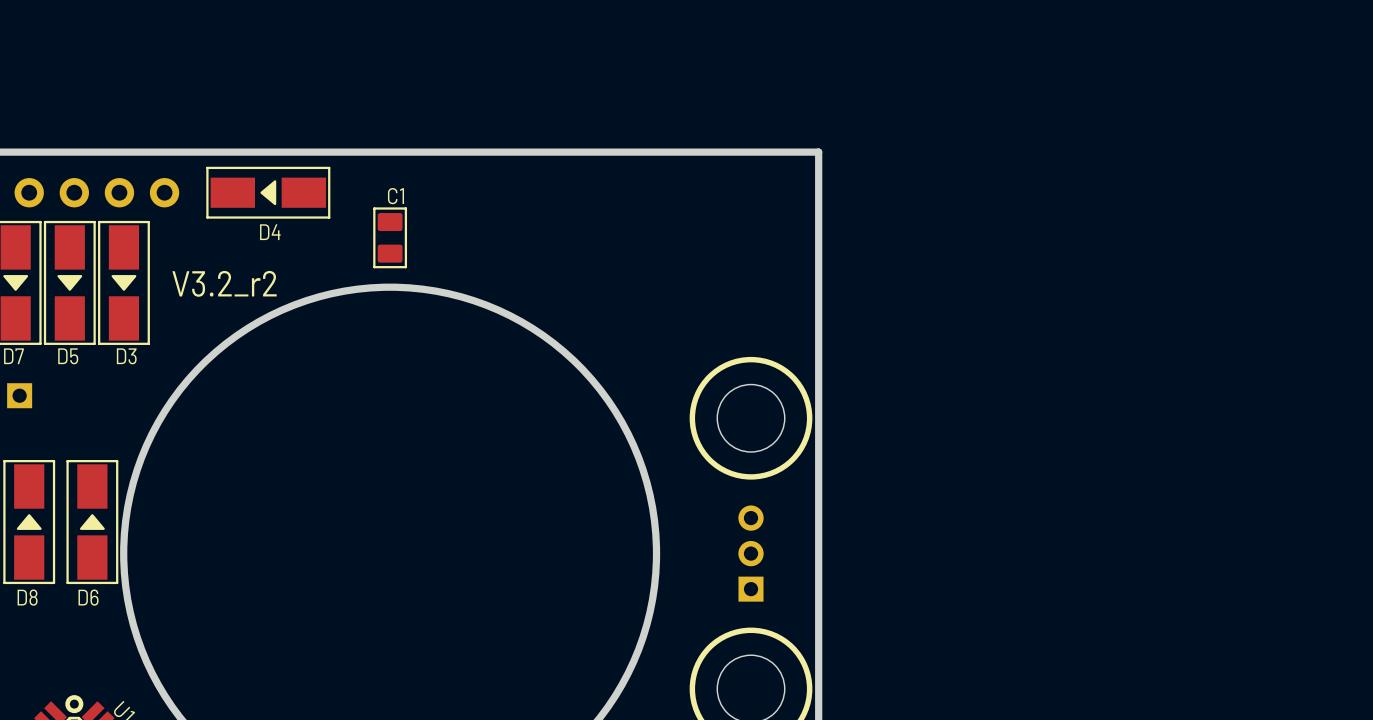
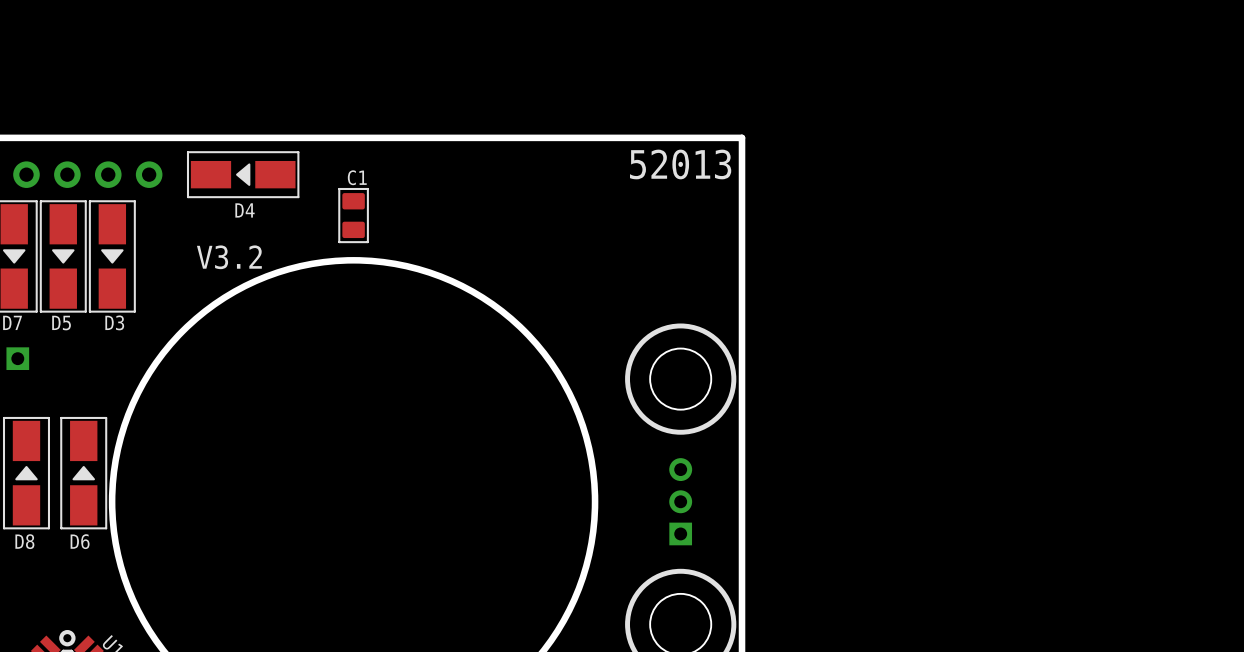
text: none -> 52013 (680, 164)
text: V3.2_r2 (224, 283) -> V3.2 (229, 257)

